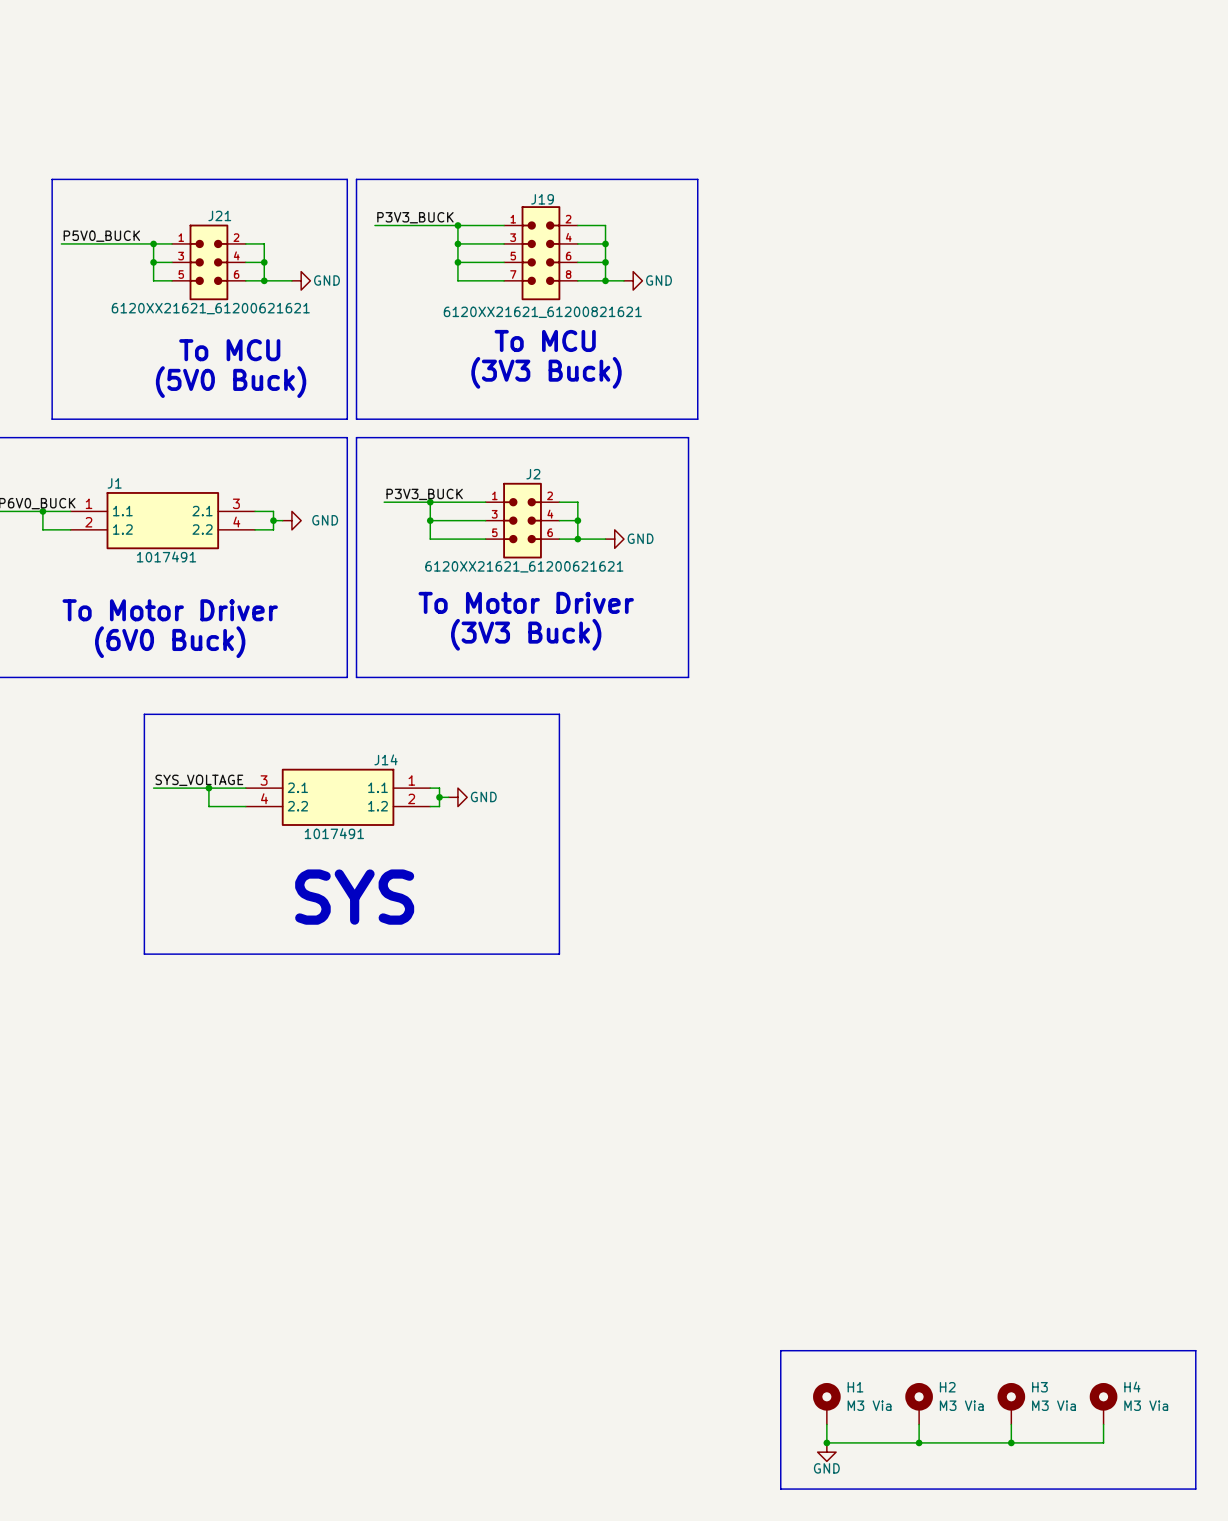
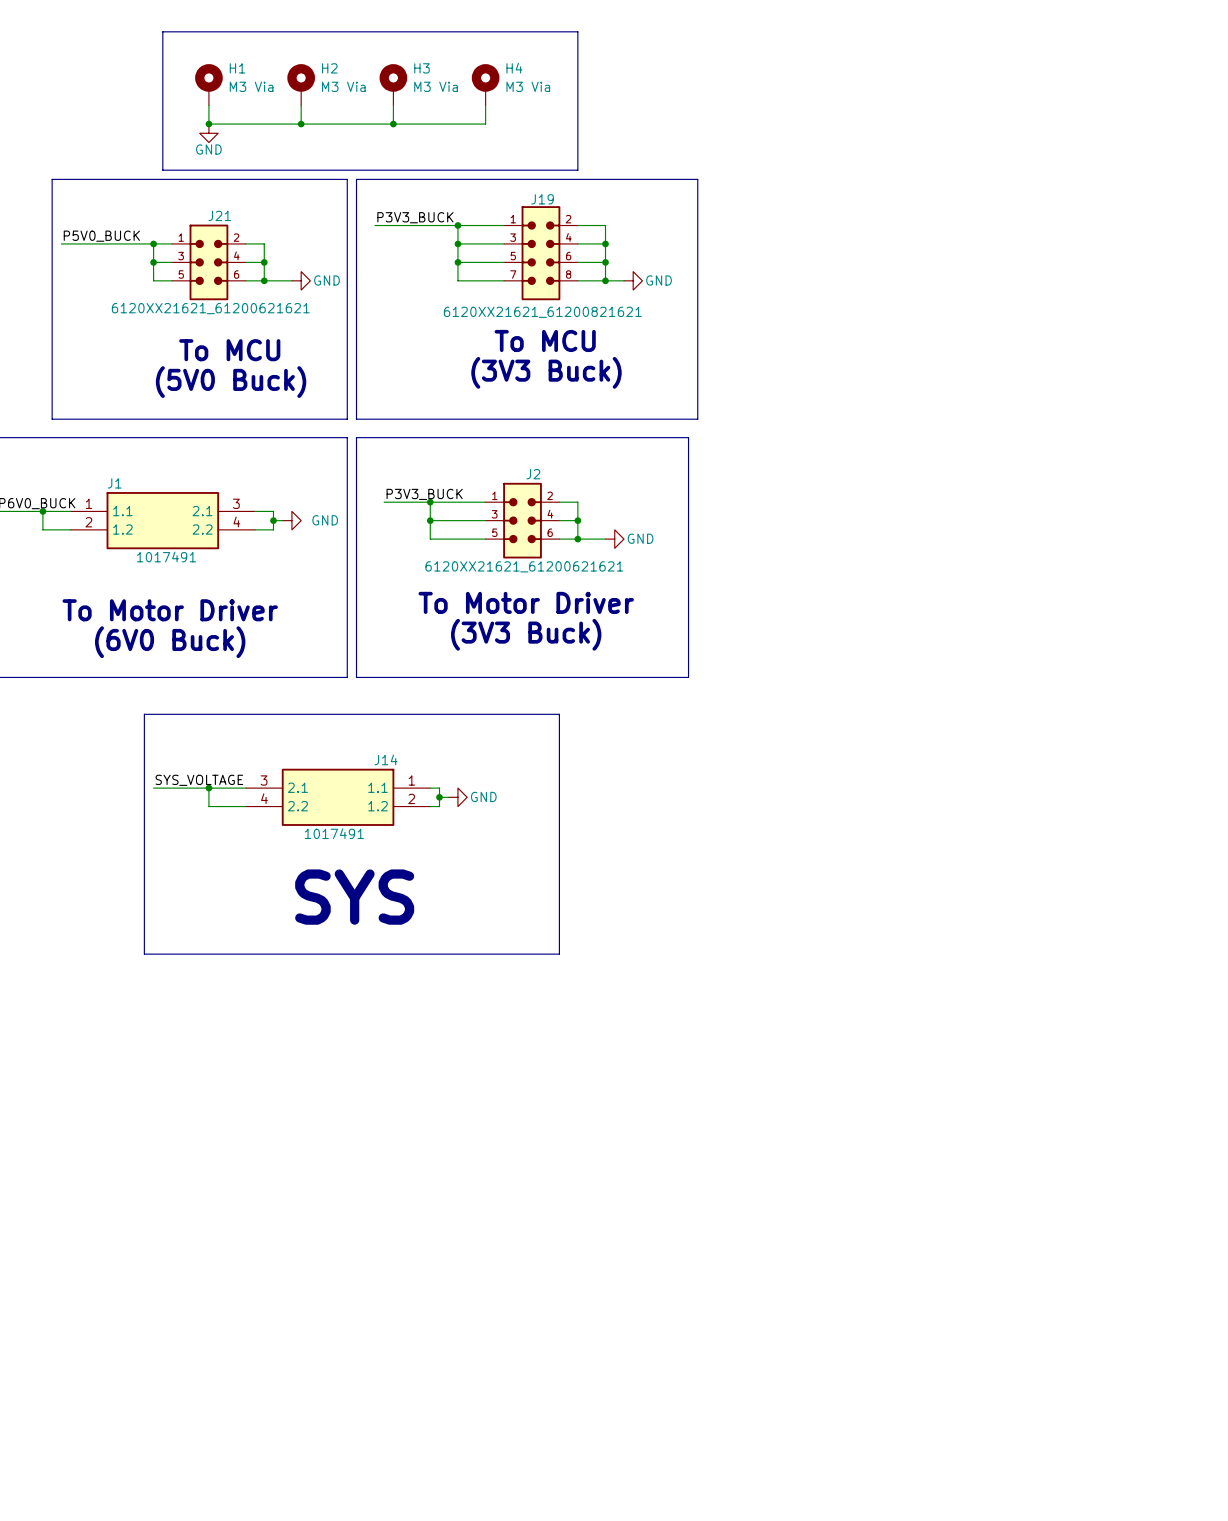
line: none -> (162, 31) (577, 31) (577, 170) (162, 170) (162, 31)
wire: none -> (208, 105) (208, 124) (485, 124) (485, 105)
wire: none -> (301, 105) (301, 124)
wire: none -> (393, 105) (393, 124)
junction: none -> (208, 124)
junction: none -> (301, 124)
junction: none -> (393, 124)
power symbol: none -> GND (208, 133)
line: (780, 1350) (1195, 1350) (1195, 1489) (780, 1489) (780, 1350) -> none
H1 position: (826, 1403) -> (208, 84)
H2 position: (919, 1403) -> (301, 84)
H3 position: (1011, 1403) -> (393, 84)
H4 position: (1103, 1403) -> (485, 84)
wire: (826, 1424) (826, 1442) (1103, 1442) (1103, 1424) -> none
wire: (919, 1424) (919, 1442) -> none
wire: (1011, 1424) (1011, 1442) -> none
junction: (826, 1442) -> none
junction: (919, 1442) -> none
junction: (1011, 1442) -> none
power symbol: GND (826, 1452) -> none

